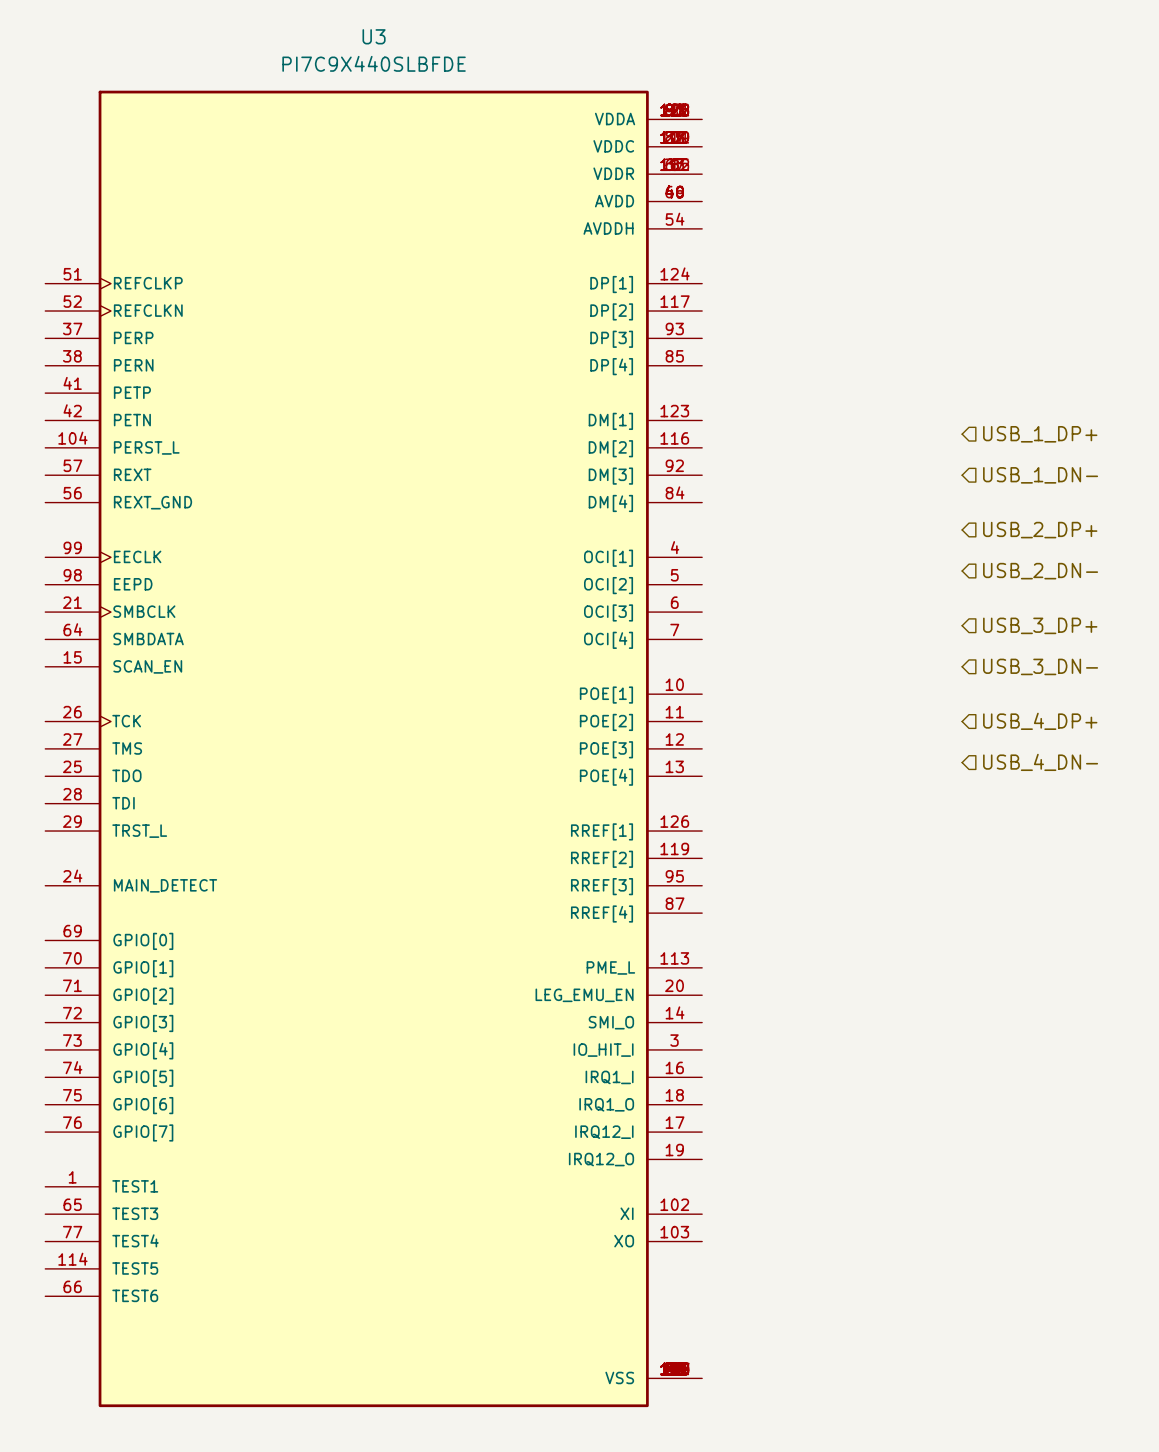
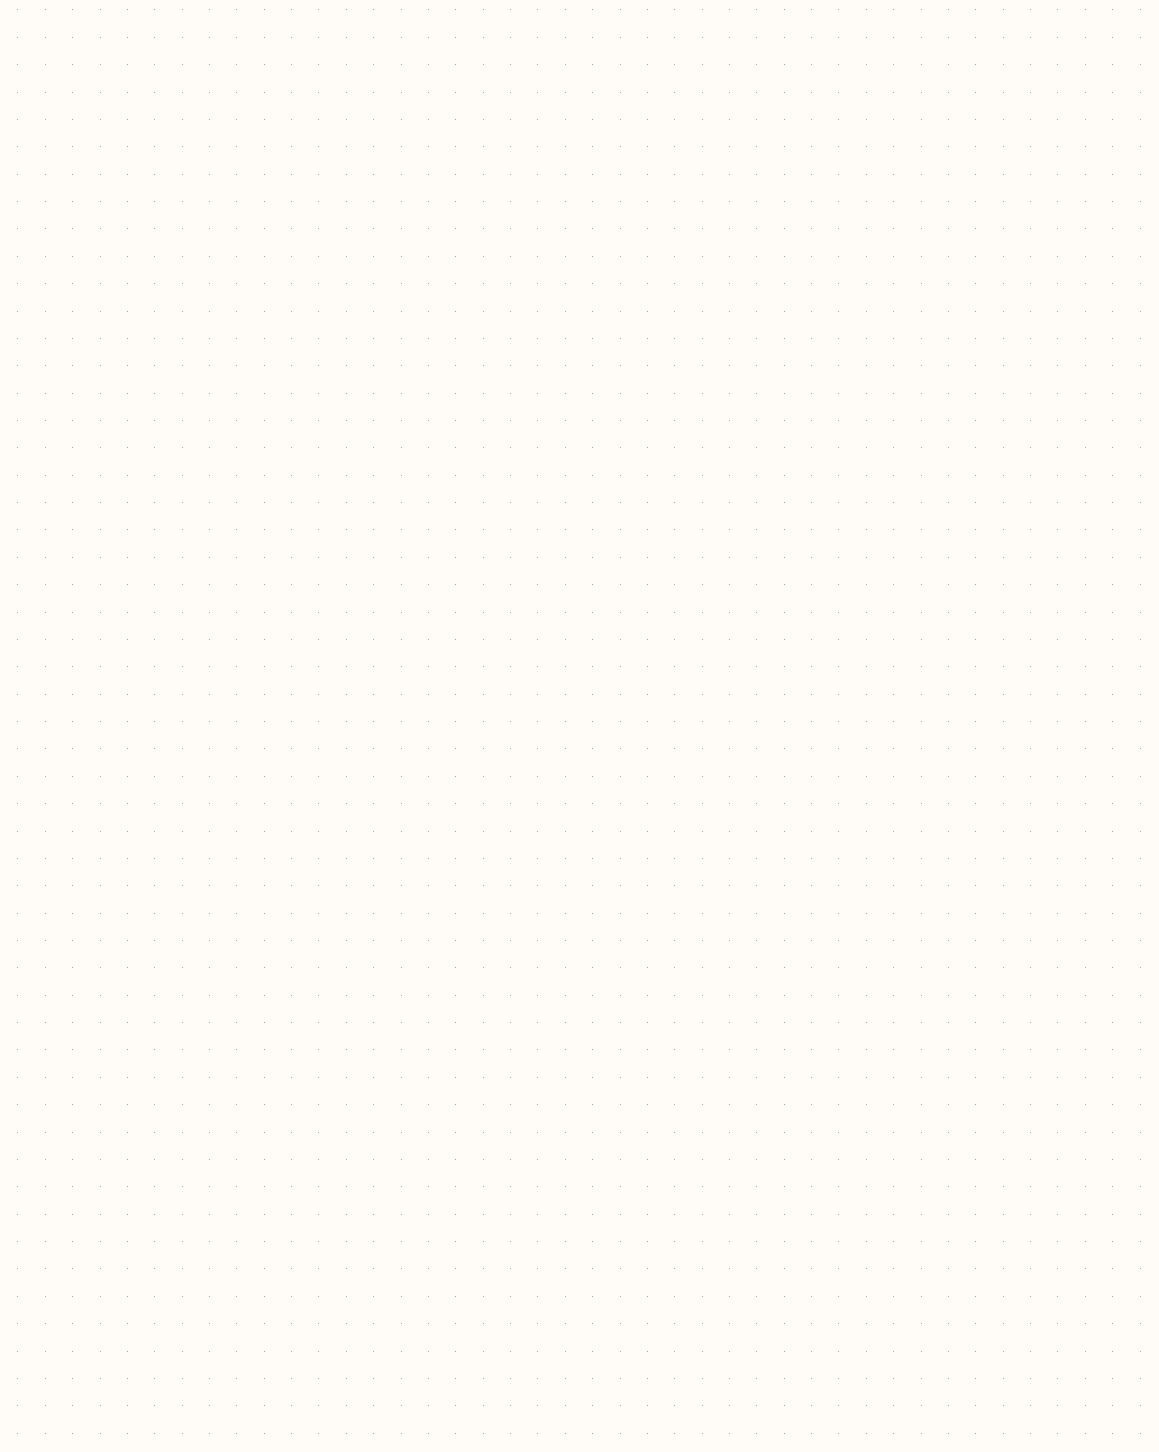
hierarchical label: USB_1_DP+ (1040, 434) -> none
hierarchical label: USB_1_DN- (1040, 475) -> none
hierarchical label: USB_2_DP+ (1040, 530) -> none
hierarchical label: USB_2_DN- (1040, 571) -> none
hierarchical label: USB_3_DP+ (1040, 625) -> none
hierarchical label: USB_3_DN- (1040, 666) -> none
hierarchical label: USB_4_DP+ (1040, 721) -> none
U3: PI7C9X440SLBFDE (373, 748) -> none
hierarchical label: USB_4_DN- (1040, 762) -> none

